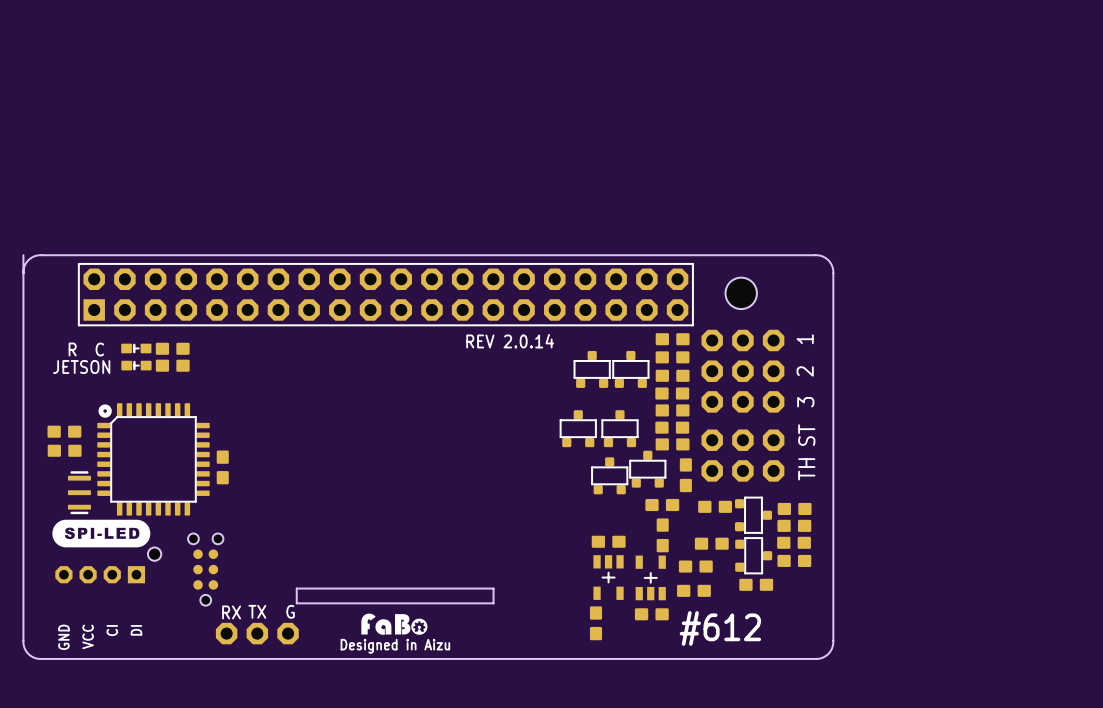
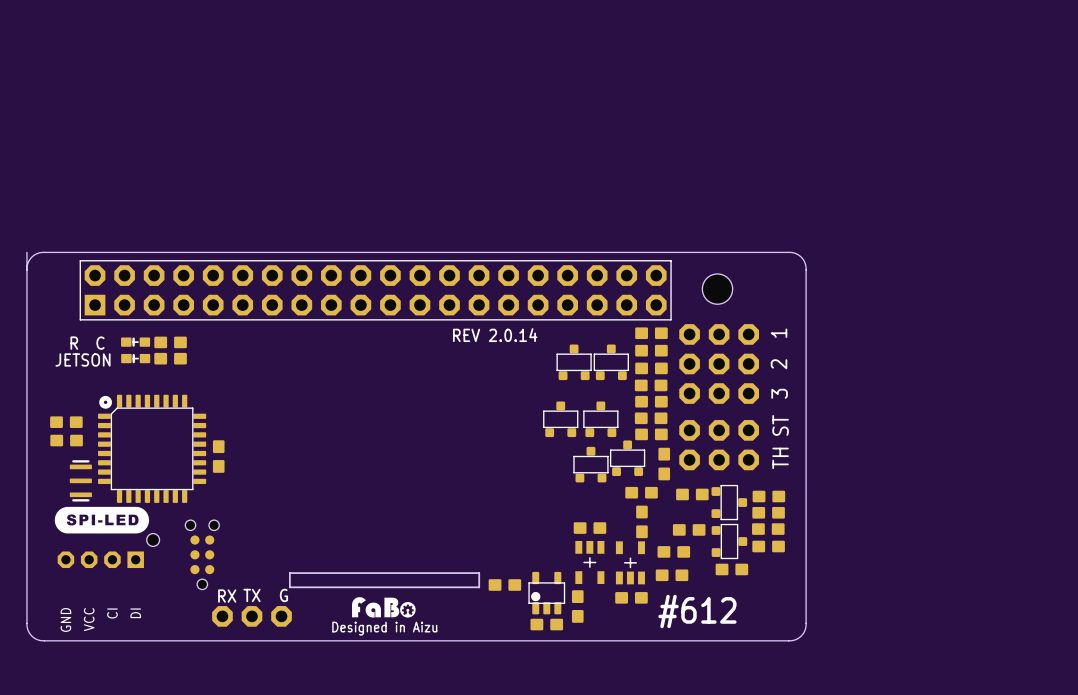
part: none -> (504, 584)
part: none -> (546, 593)
part: none -> (546, 624)

